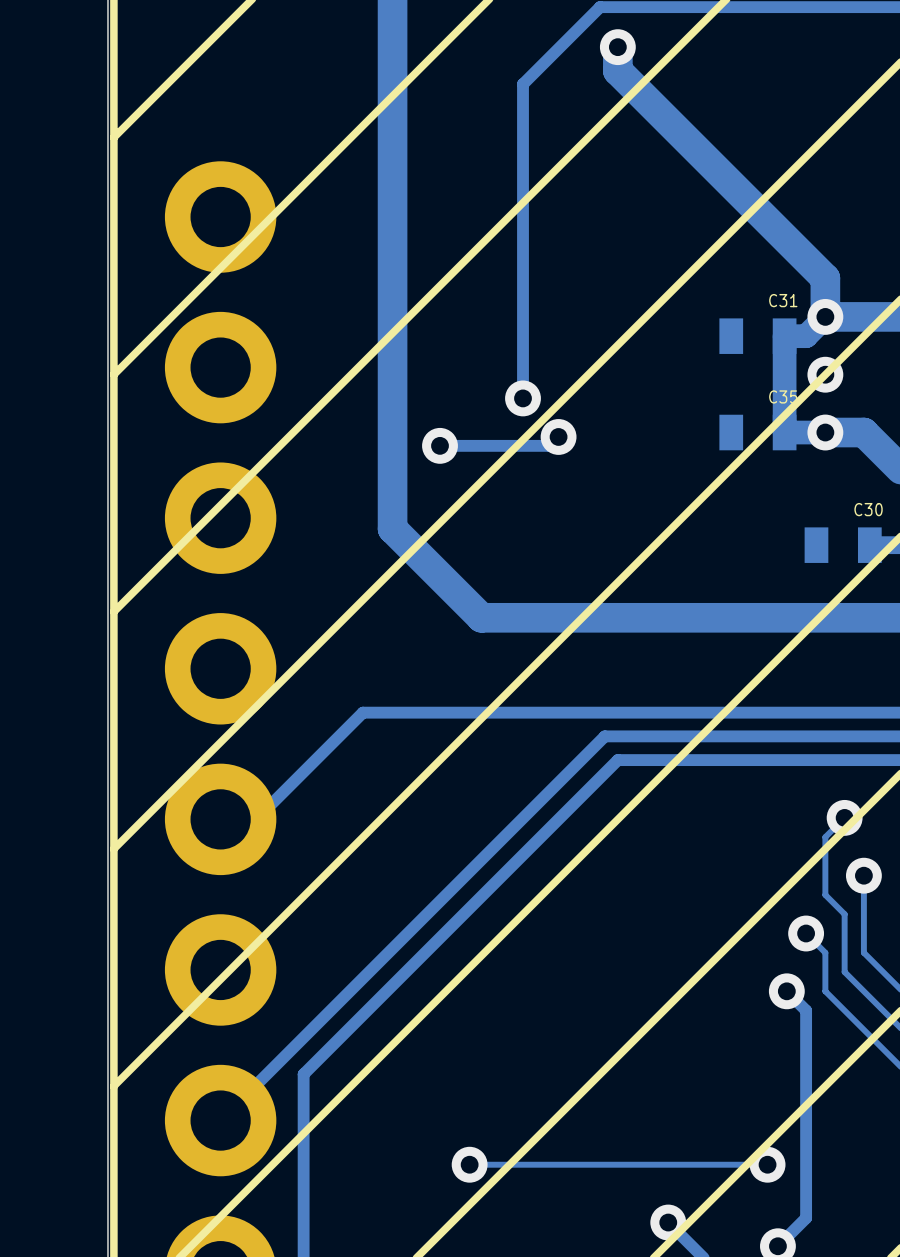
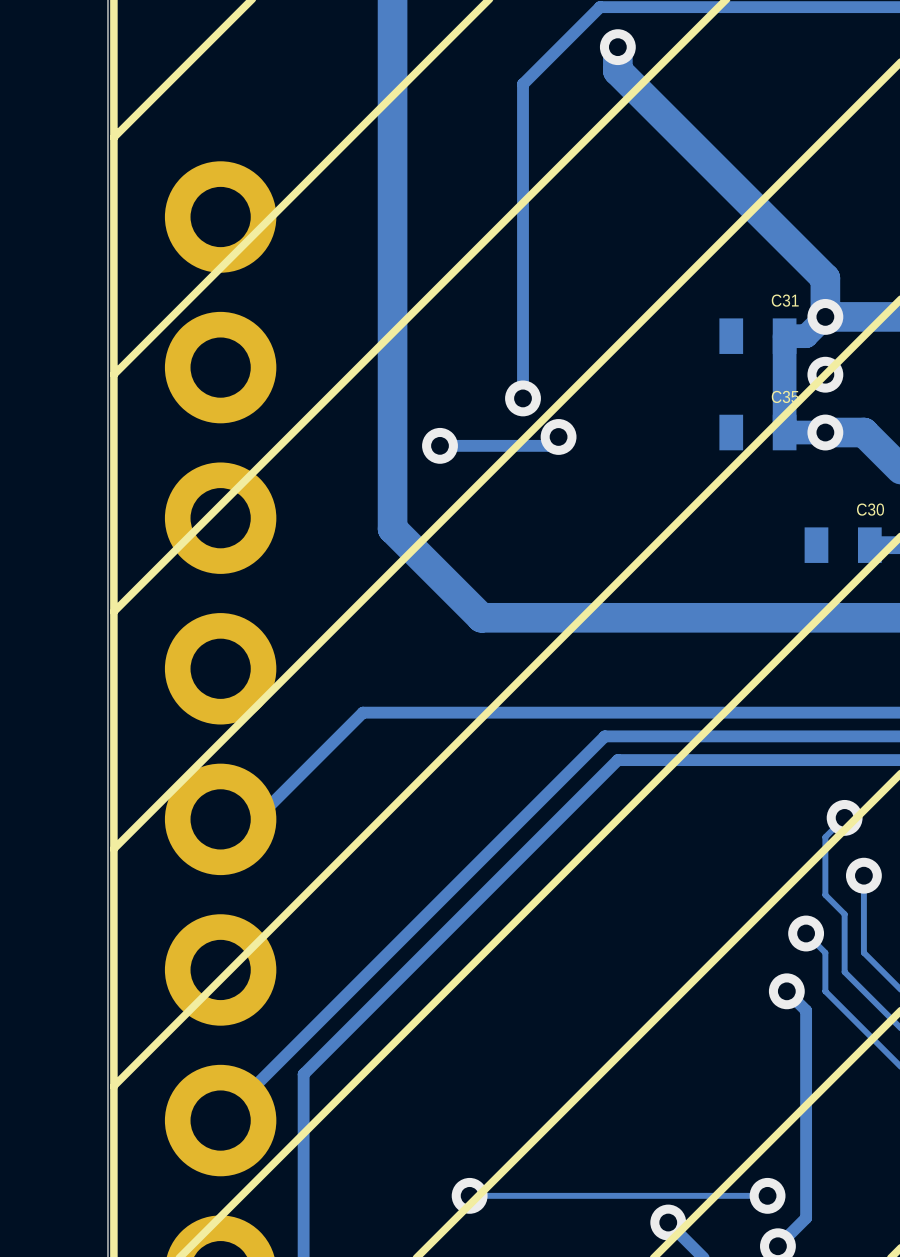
via position: (469, 1164) -> (469, 1195)
track: (767, 1164) (469, 1164) -> (767, 1195) (469, 1195)
via position: (767, 1164) -> (767, 1195)

